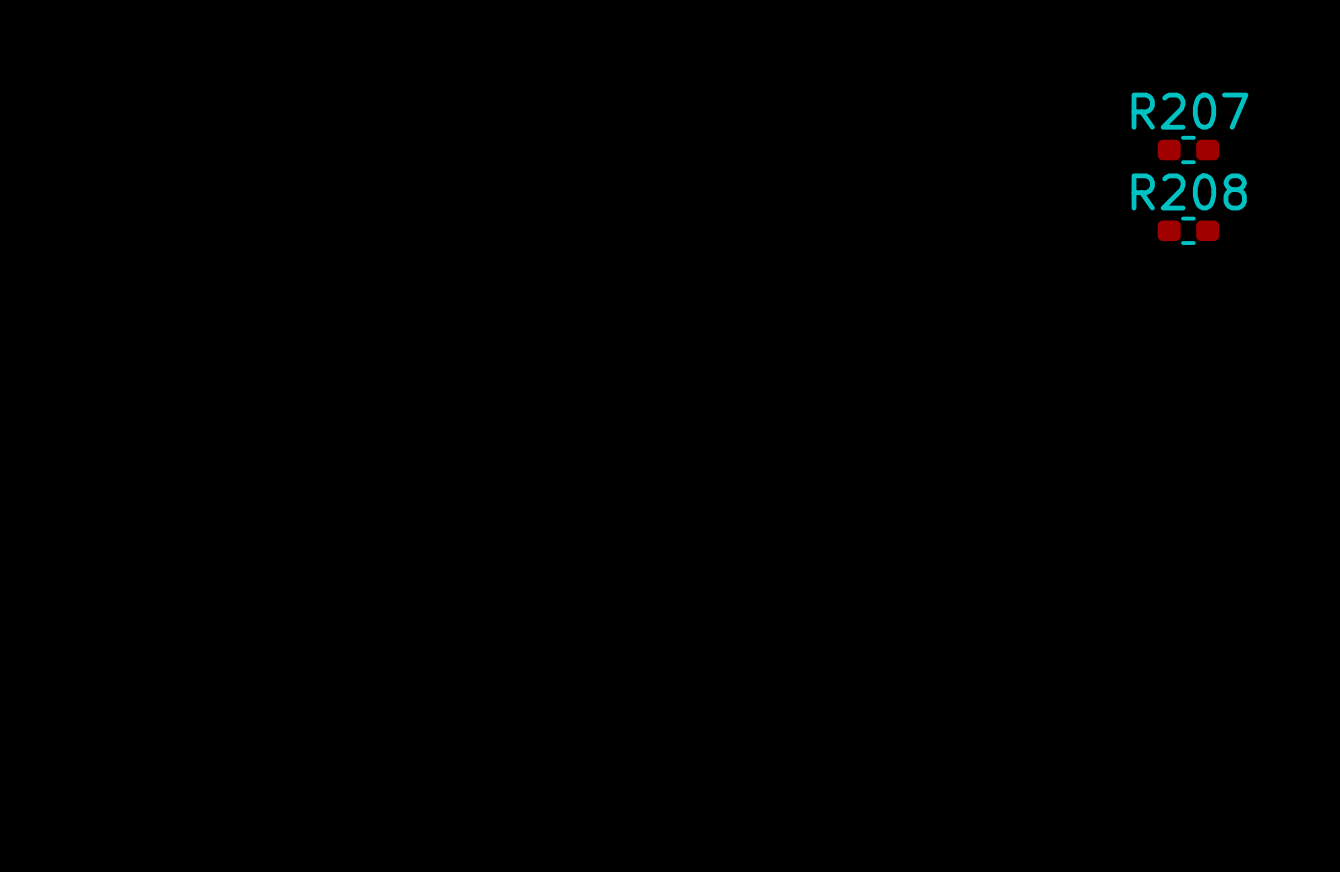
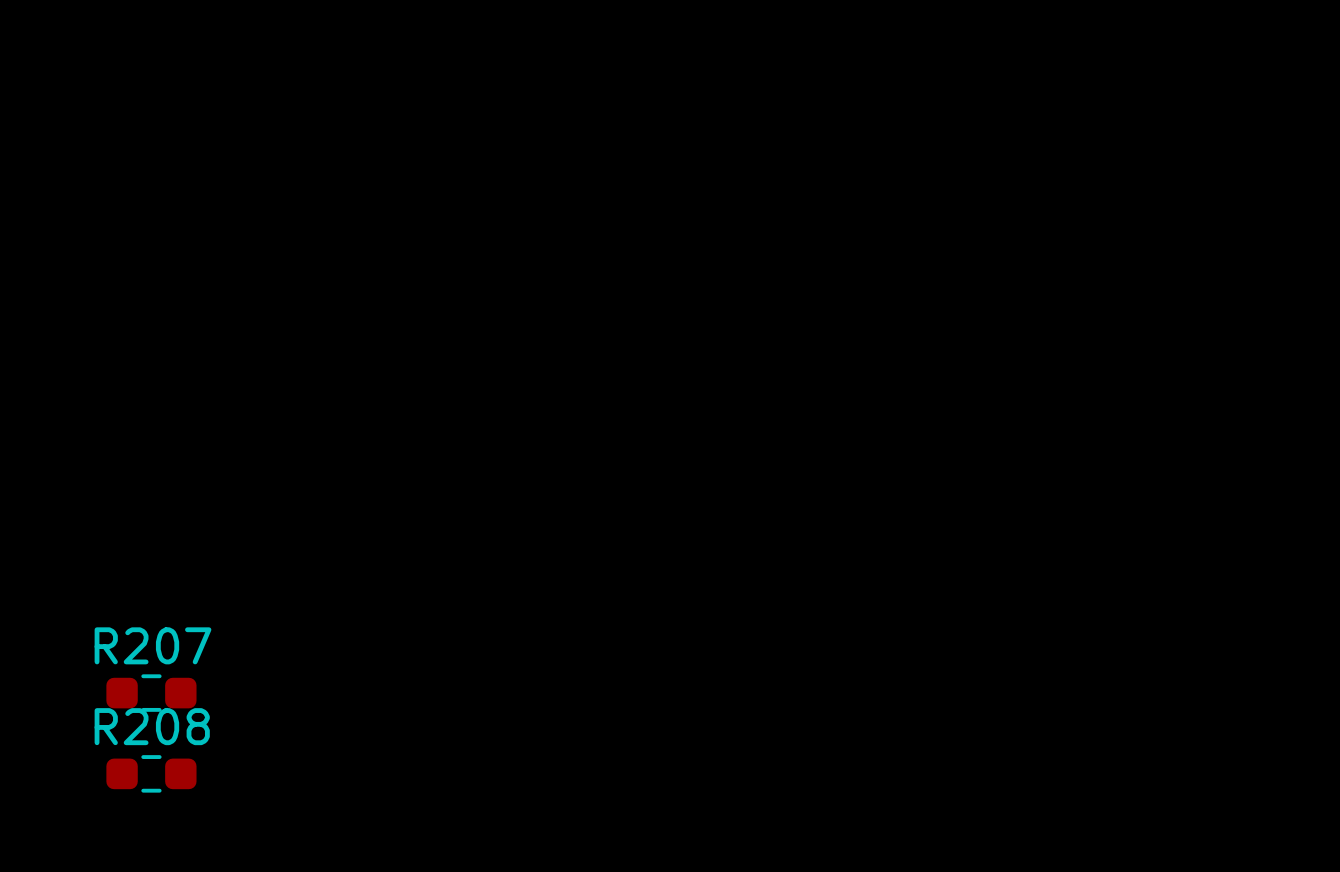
R207 footprint: [1157, 135, 1220, 165] -> [106, 674, 197, 712]
R208 footprint: [1157, 216, 1220, 245] -> [106, 755, 197, 793]

